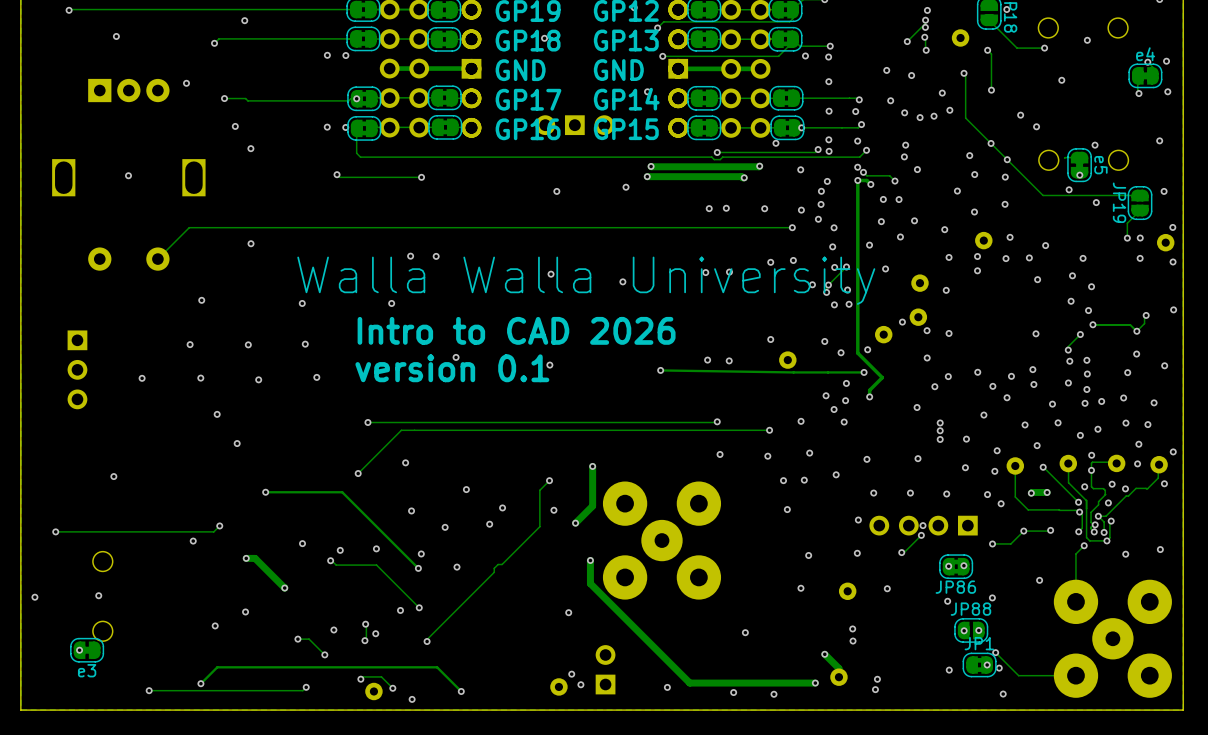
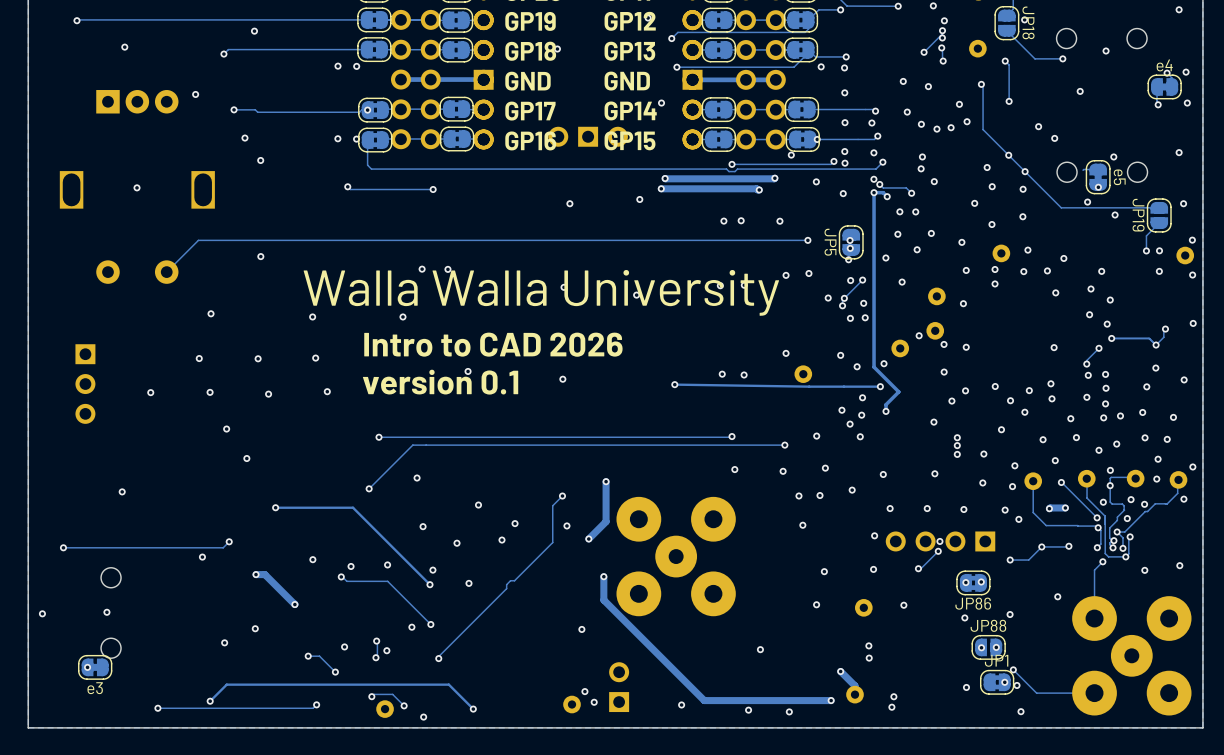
via: (821, 191) -> none
via: (821, 204) -> none
via: (801, 210) -> none
via: (818, 219) -> none
JP5: none -> (851, 242)
via: none -> (850, 248)

